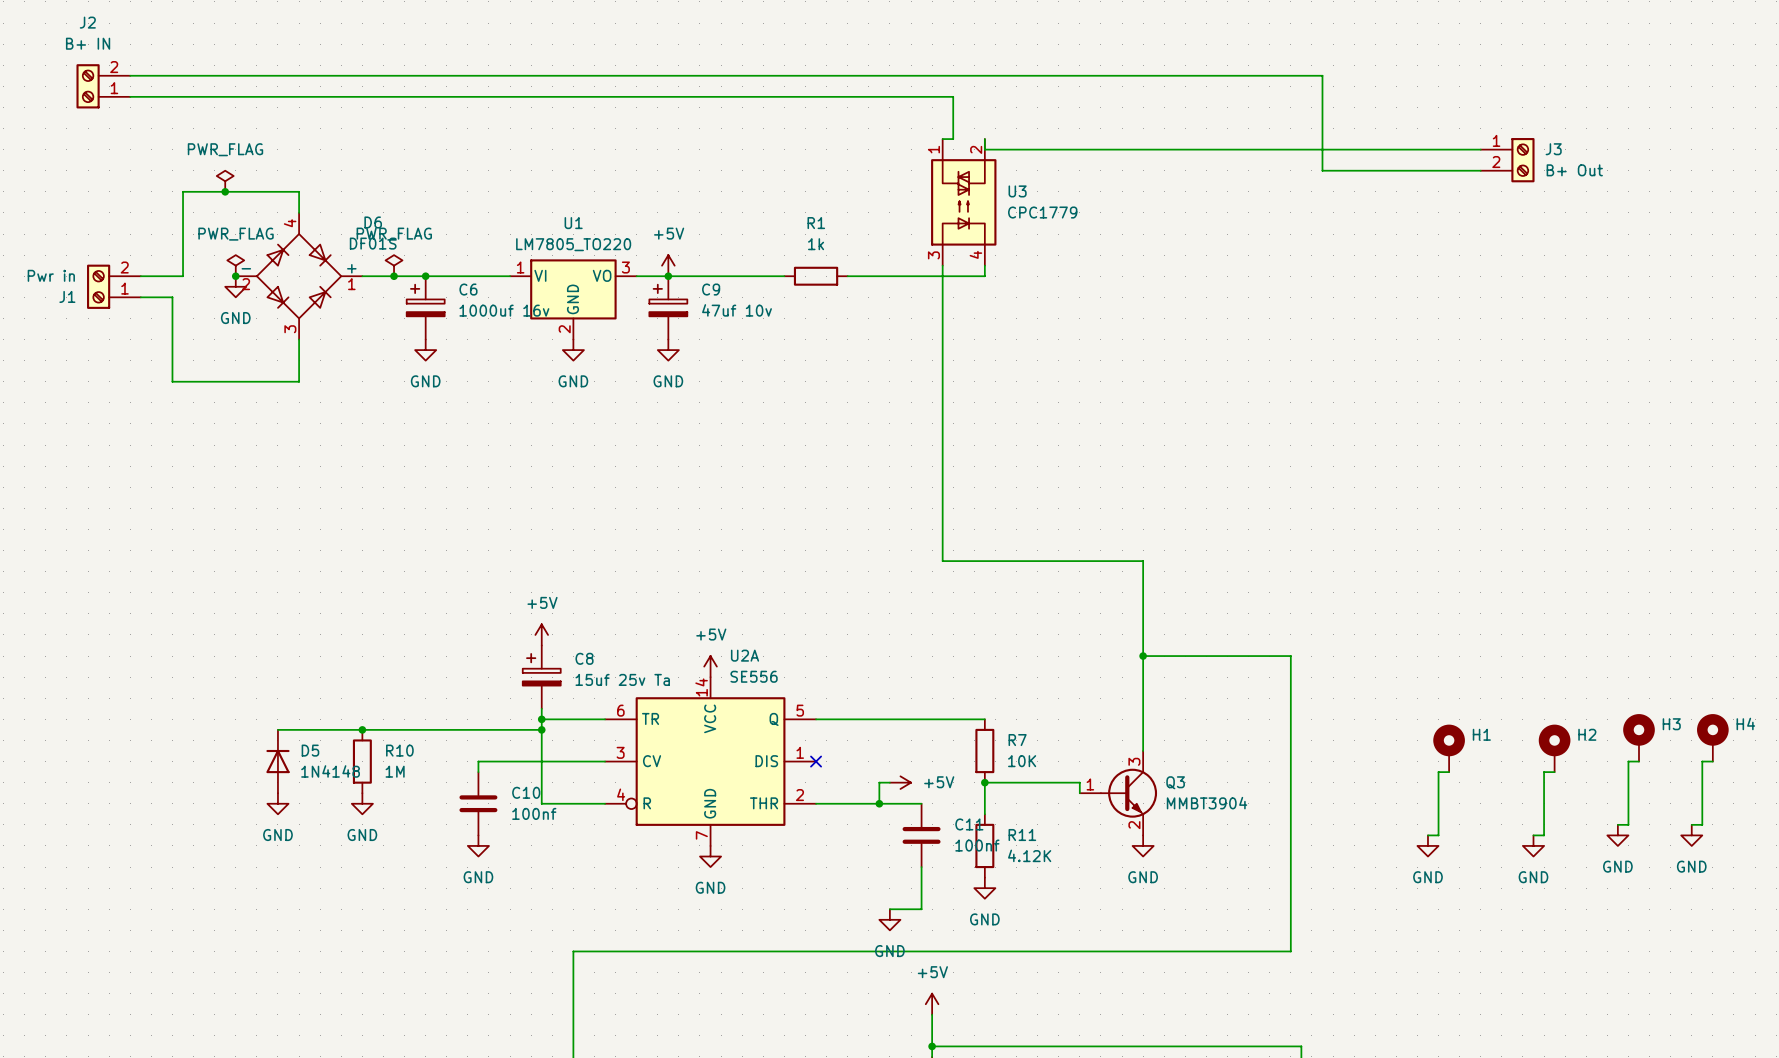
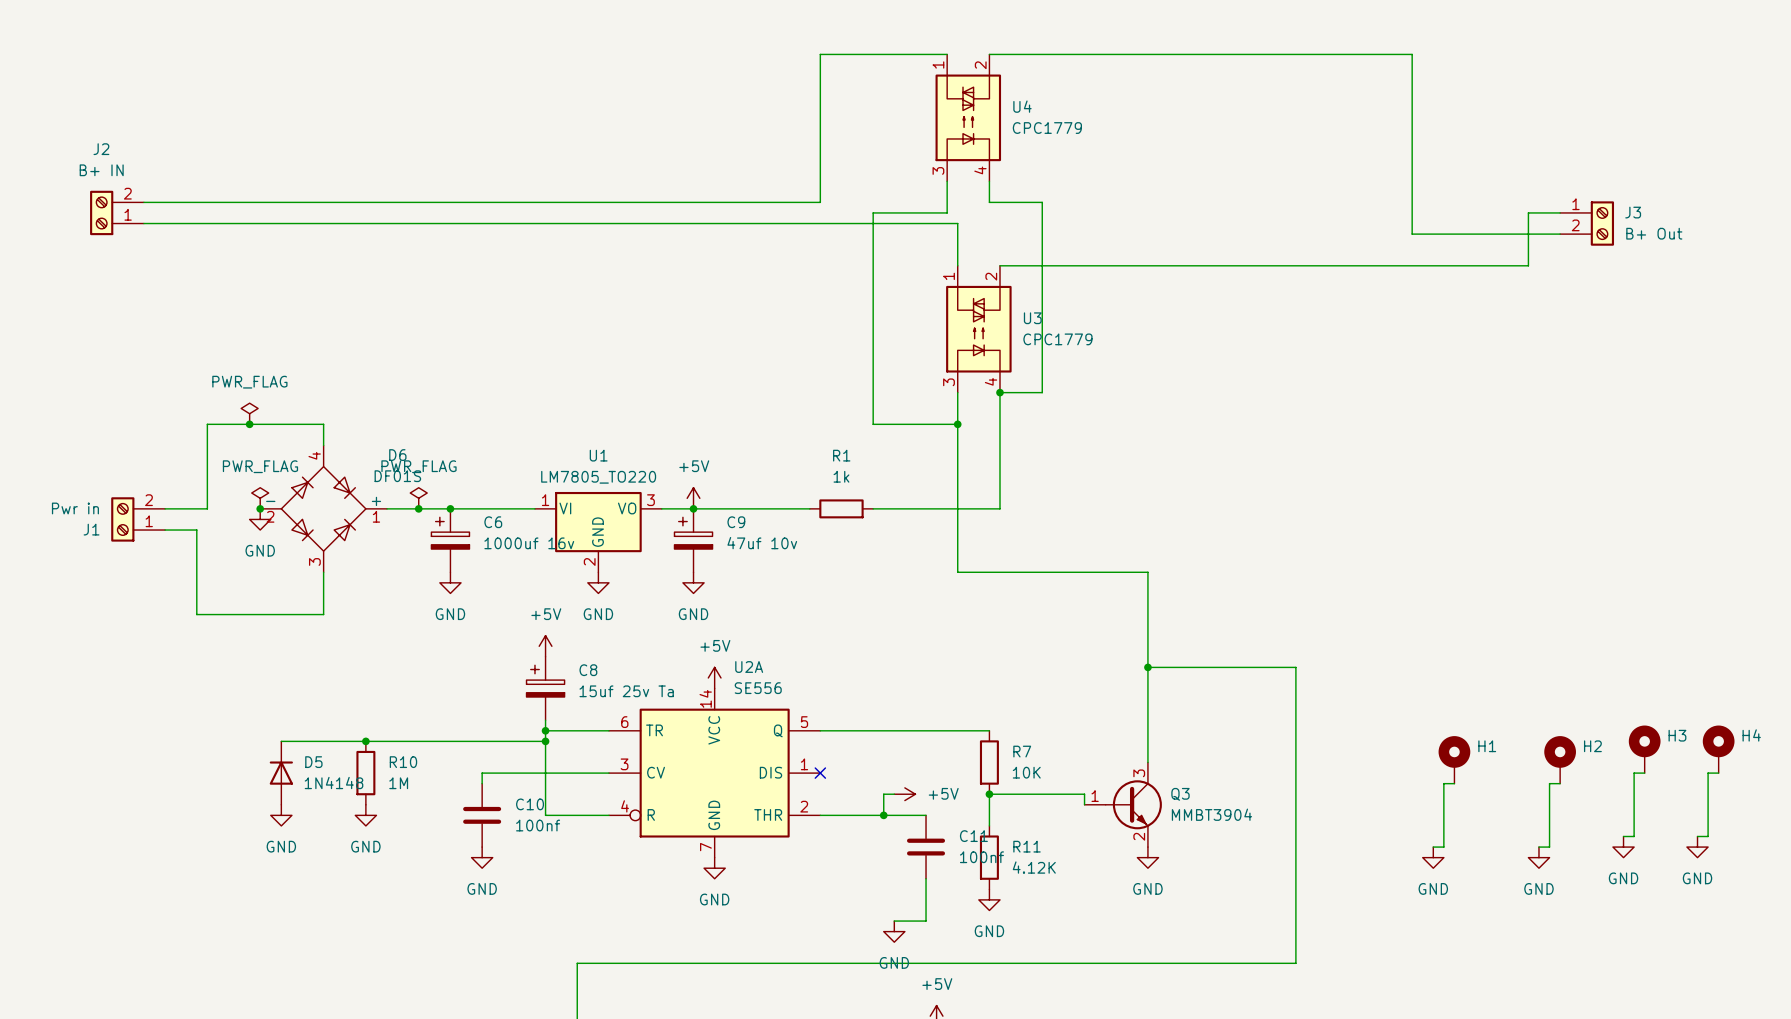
wire: none -> (989, 54) (1412, 54) (1412, 234) (1560, 234)
wire: (130, 75) (1322, 75) (1322, 170) (1480, 170) -> none
J2 position: (103, 86) -> (117, 212)
wire: (130, 96) (953, 96) (953, 139) (942, 139) -> none
U4: none -> CPC1779 (968, 117)
wire: (984, 139) (984, 149) (1480, 149) -> none
J3 position: (1507, 160) -> (1587, 223)
wire: none -> (947, 181) (947, 212) (873, 212) (873, 424) (957, 424)
wire: none -> (989, 181) (989, 202) (1042, 202) (1042, 392) (999, 392) (999, 508) (873, 508)
power symbol: PWR_FLAG (225, 181) -> none
wire: (183, 191) (183, 276) (140, 276) -> (186, 202) (143, 202)
junction: (225, 191) -> none
wire: (299, 191) (299, 212) -> (302, 202) (820, 202) (820, 54) (947, 54)
U3 position: (963, 202) -> (978, 329)
wire: none -> (1560, 212) (1528, 212) (1528, 265) (999, 265)
wire: none -> (143, 223) (957, 223) (957, 265)
power symbol: PWR_FLAG (235, 265) -> none
power symbol: PWR_FLAG (394, 265) -> none
power symbol: +5V (668, 265) -> none
wire: (942, 265) (942, 561) (953, 561) -> (957, 392) (957, 572)
wire: (984, 265) (984, 276) (847, 276) -> none
junction: (235, 276) -> none
D6 position: (299, 276) -> (323, 508)
wire: (362, 276) (510, 276) -> none
junction: (394, 276) -> none
junction: (425, 276) -> none
wire: (636, 276) (784, 276) -> none
junction: (668, 276) -> none
R1 position: (816, 276) -> (841, 508)
J1 position: (113, 286) -> (138, 519)
power symbol: GND (235, 286) -> none
wire: (140, 297) (172, 297) (172, 381) (299, 381) (299, 339) -> none
U1 position: (573, 299) -> (598, 532)
C6 position: (425, 307) -> (450, 540)
C9 position: (668, 307) -> (693, 540)
power symbol: GND (425, 350) -> none
power symbol: GND (573, 350) -> none
power symbol: GND (668, 350) -> none
junction: none -> (999, 392)
power symbol: none -> PWR_FLAG (249, 413)
junction: none -> (249, 424)
junction: none -> (957, 424)
wire: none -> (323, 445) (323, 424) (207, 424) (207, 508) (165, 508)
power symbol: none -> PWR_FLAG (260, 498)
power symbol: none -> PWR_FLAG (418, 498)
power symbol: none -> +5V (693, 498)
junction: none -> (260, 508)
wire: none -> (387, 508) (534, 508)
junction: none -> (418, 508)
junction: none -> (450, 508)
wire: none -> (661, 508) (809, 508)
junction: none -> (693, 508)
power symbol: none -> GND (260, 519)
wire: none -> (165, 530) (196, 530) (196, 614) (323, 614) (323, 572)
power symbol: none -> GND (450, 582)
power symbol: none -> GND (598, 582)
power symbol: none -> GND (693, 582)

